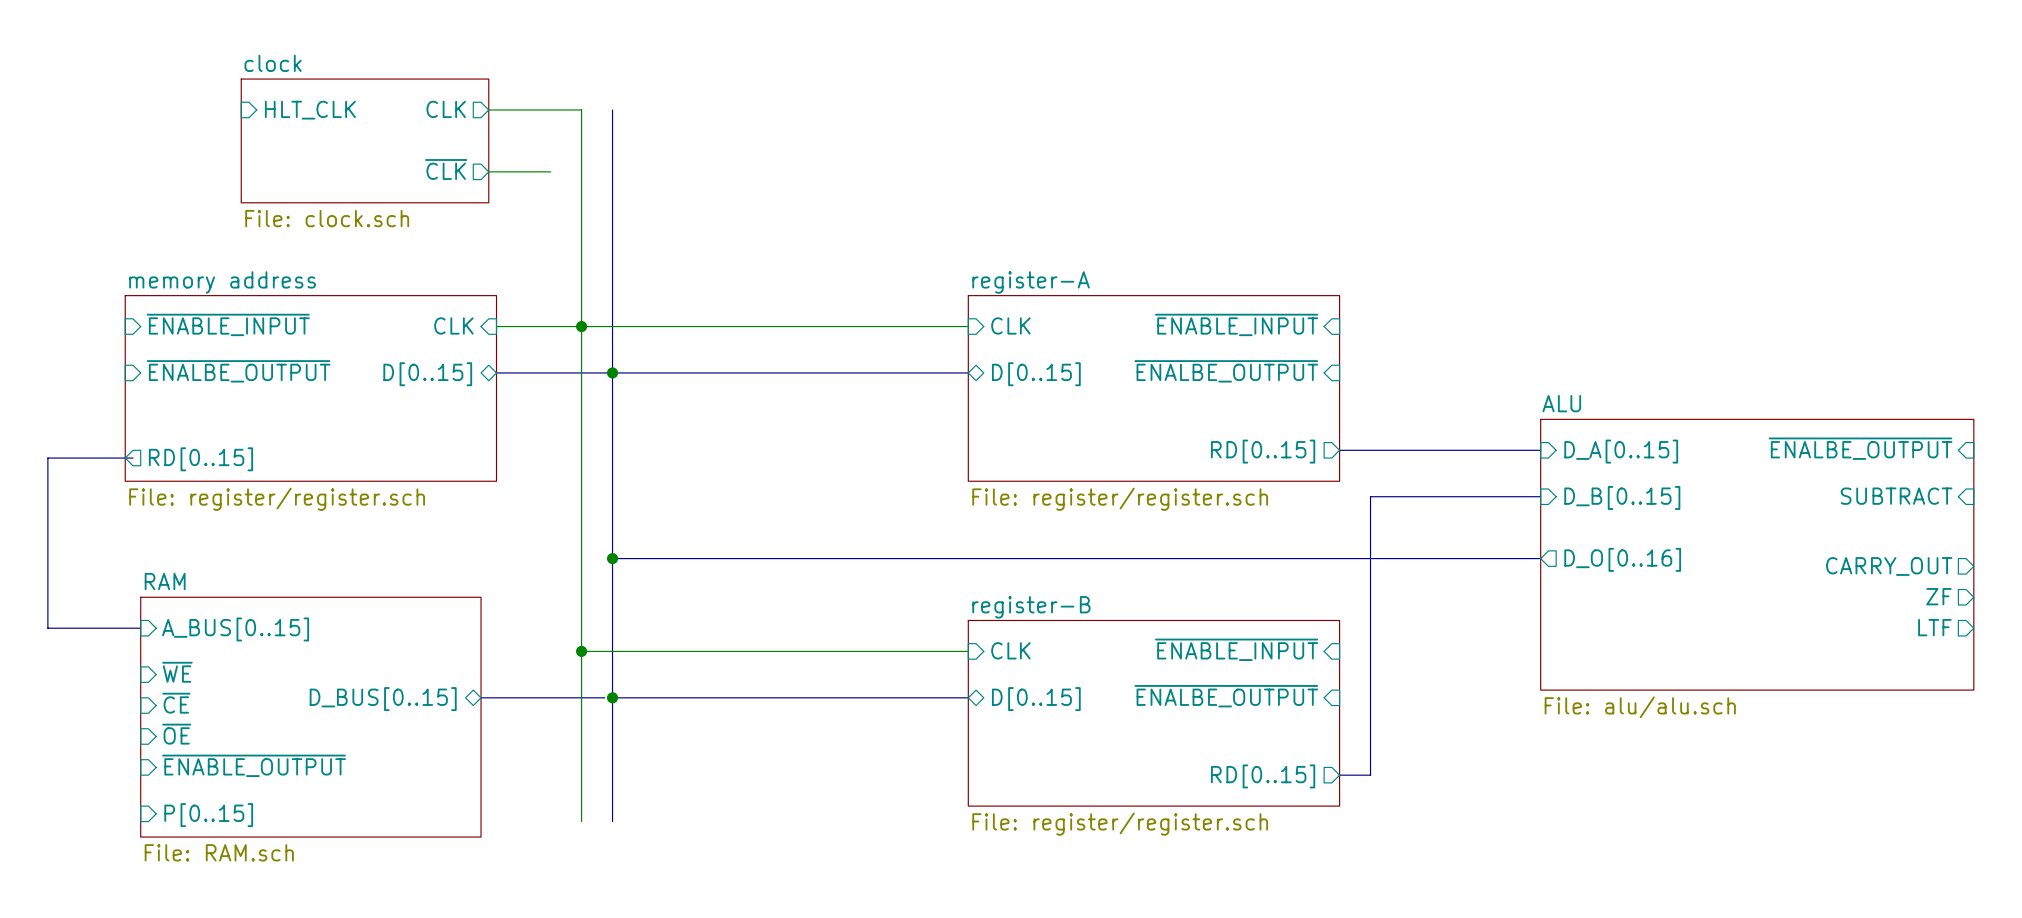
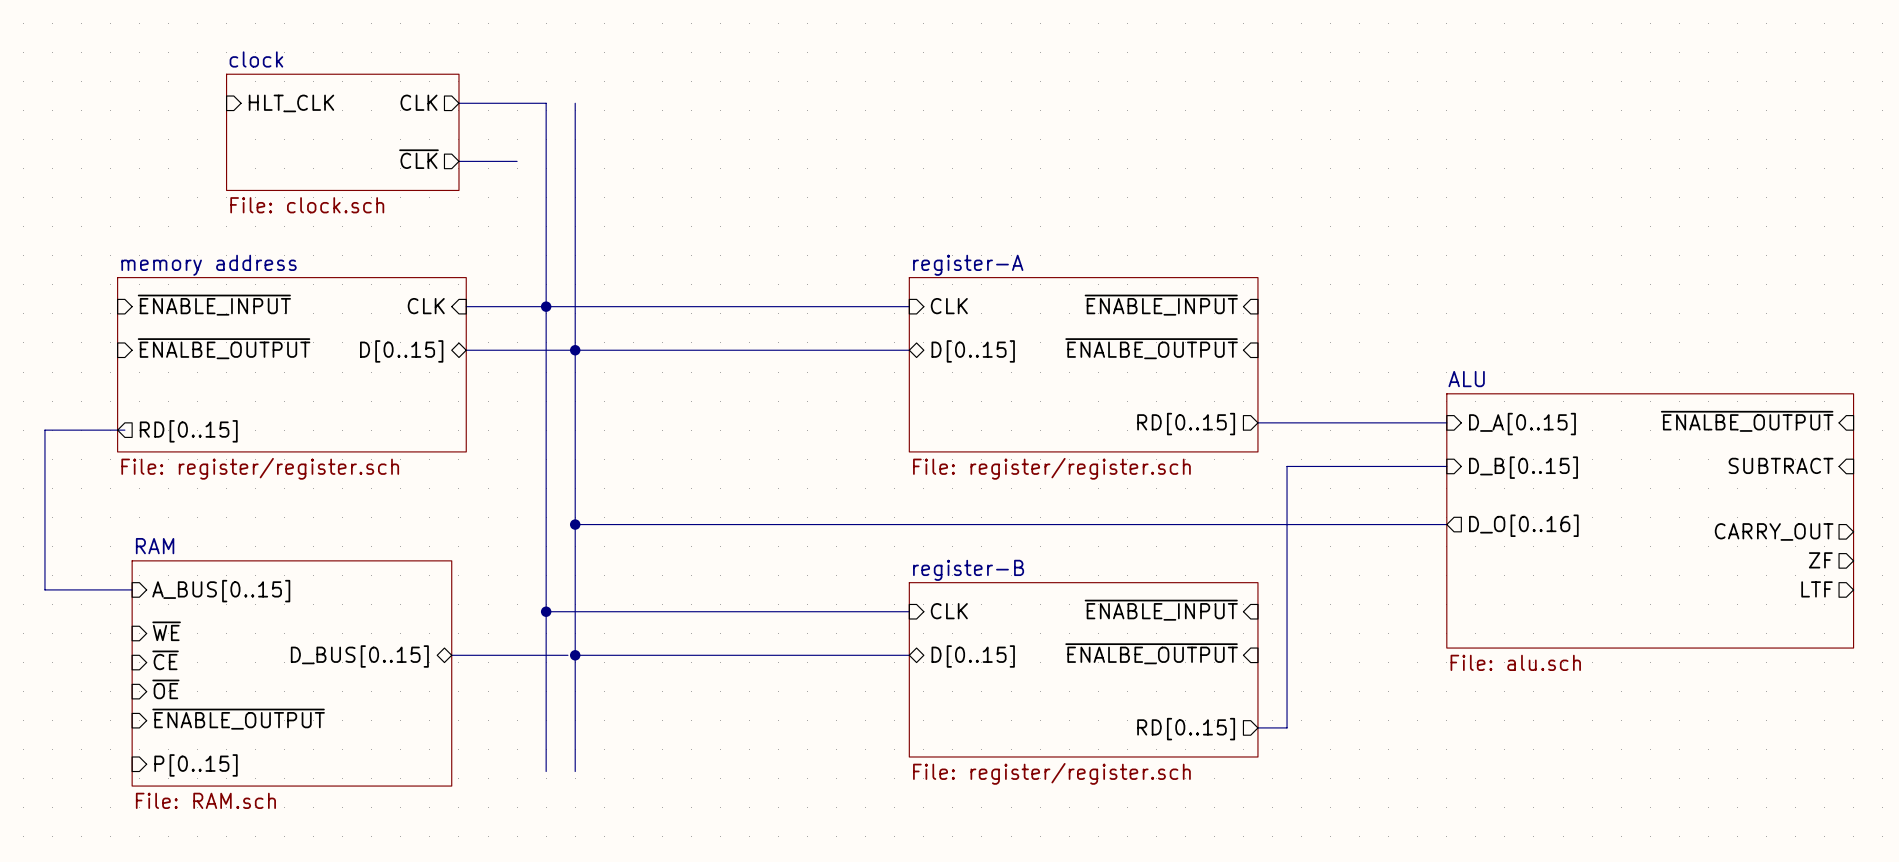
sheet ALU value: File: alu/alu.sch (1640, 707) -> File: alu.sch (1515, 662)

